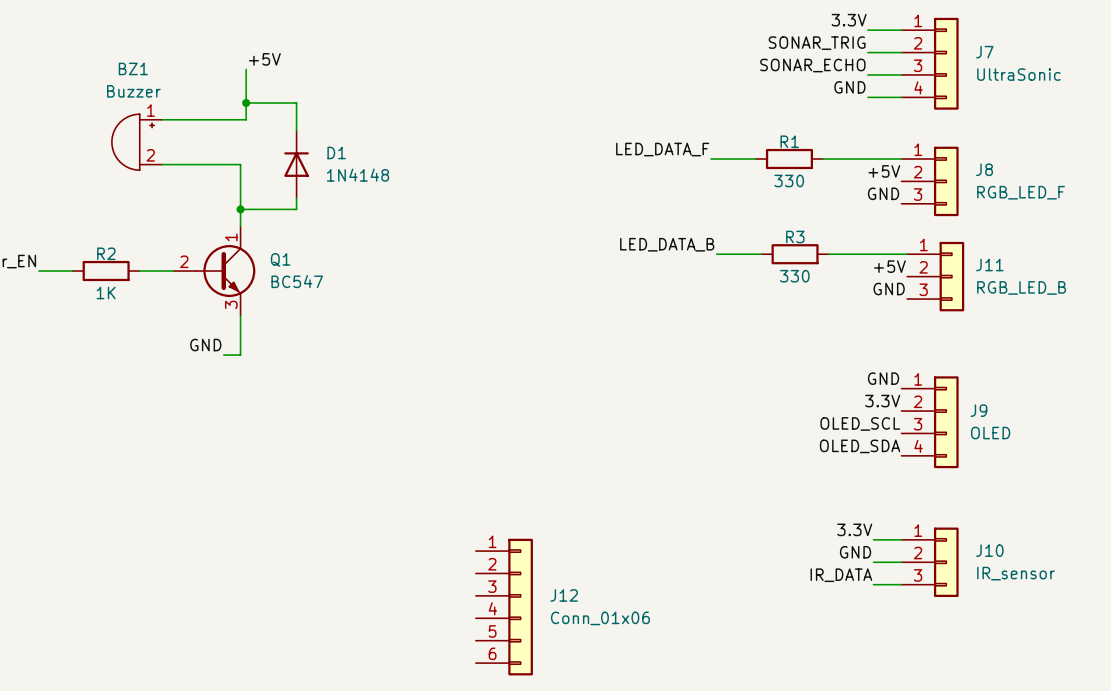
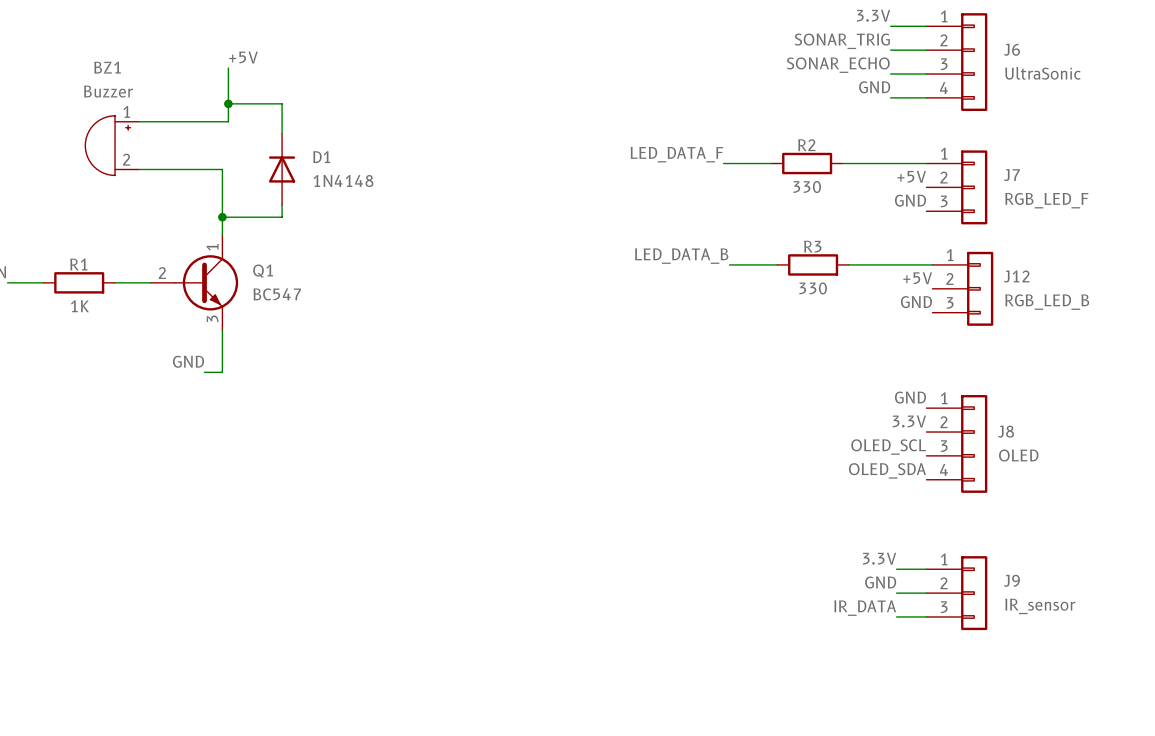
J7 name: J7 (984, 52) -> J6 (1011, 49)
R1 name: R1 (789, 141) -> R2 (806, 145)
J8 name: J8 (984, 169) -> J7 (1011, 175)
R2 name: R2 (106, 253) -> R1 (78, 264)
J11 name: J11 (989, 264) -> J12 (1016, 276)
J9 name: J9 (978, 410) -> J8 (1006, 431)
J10 name: J10 (989, 550) -> J9 (1011, 580)
J12: Conn_01x06 (504, 607) -> none

